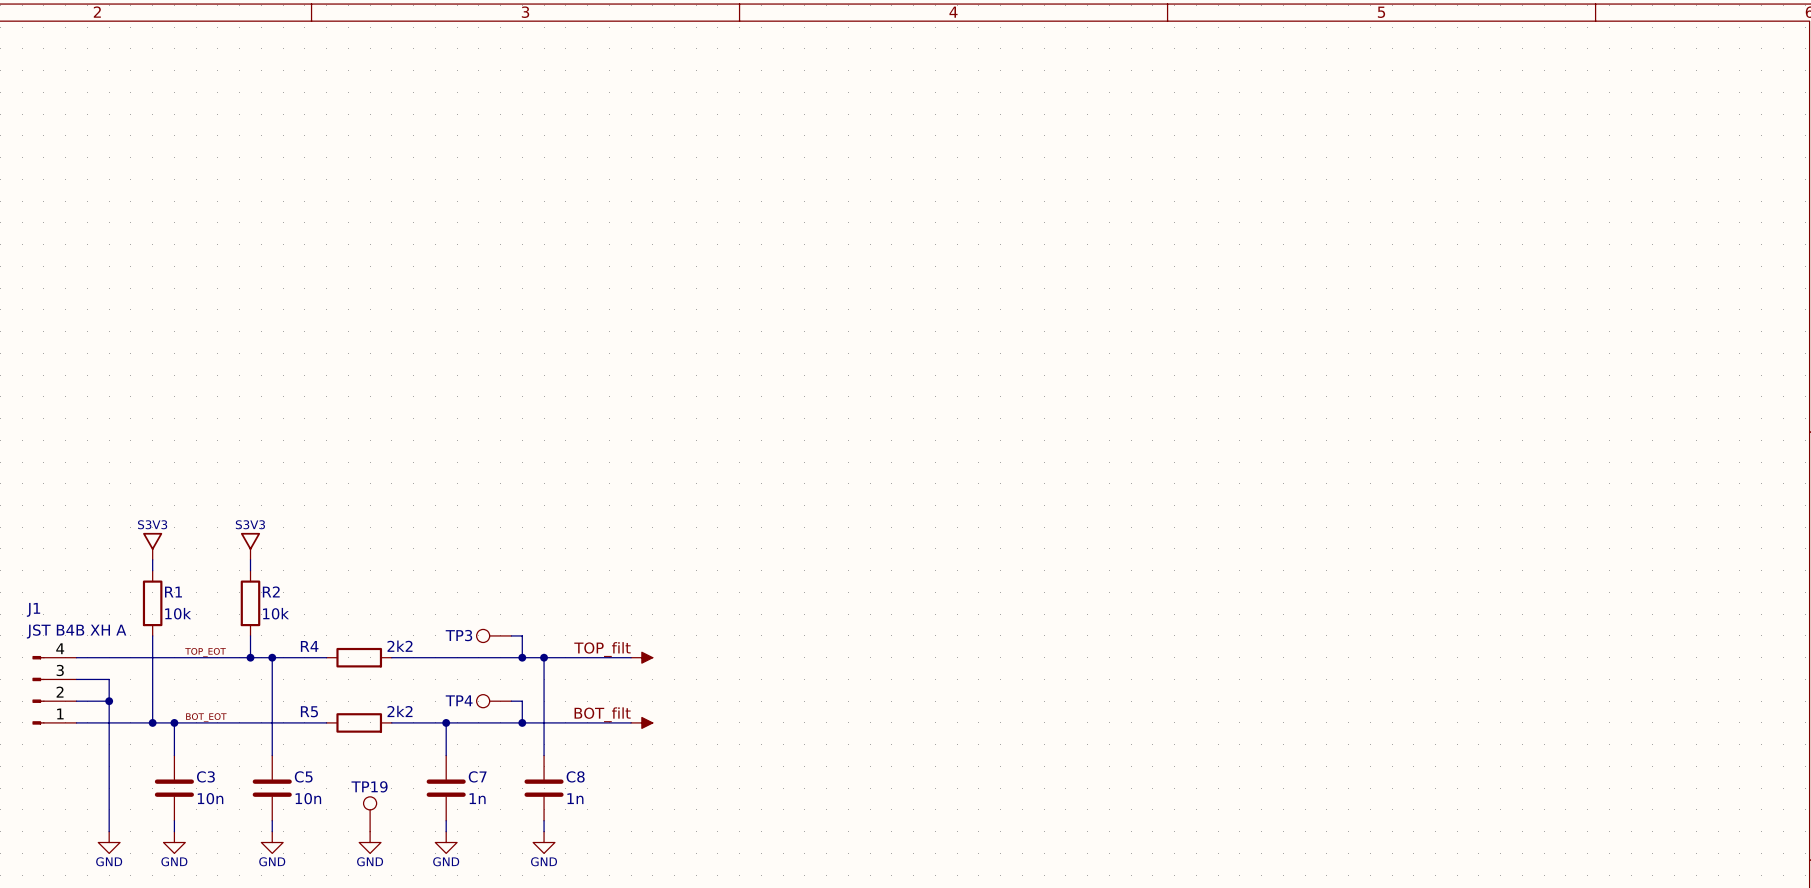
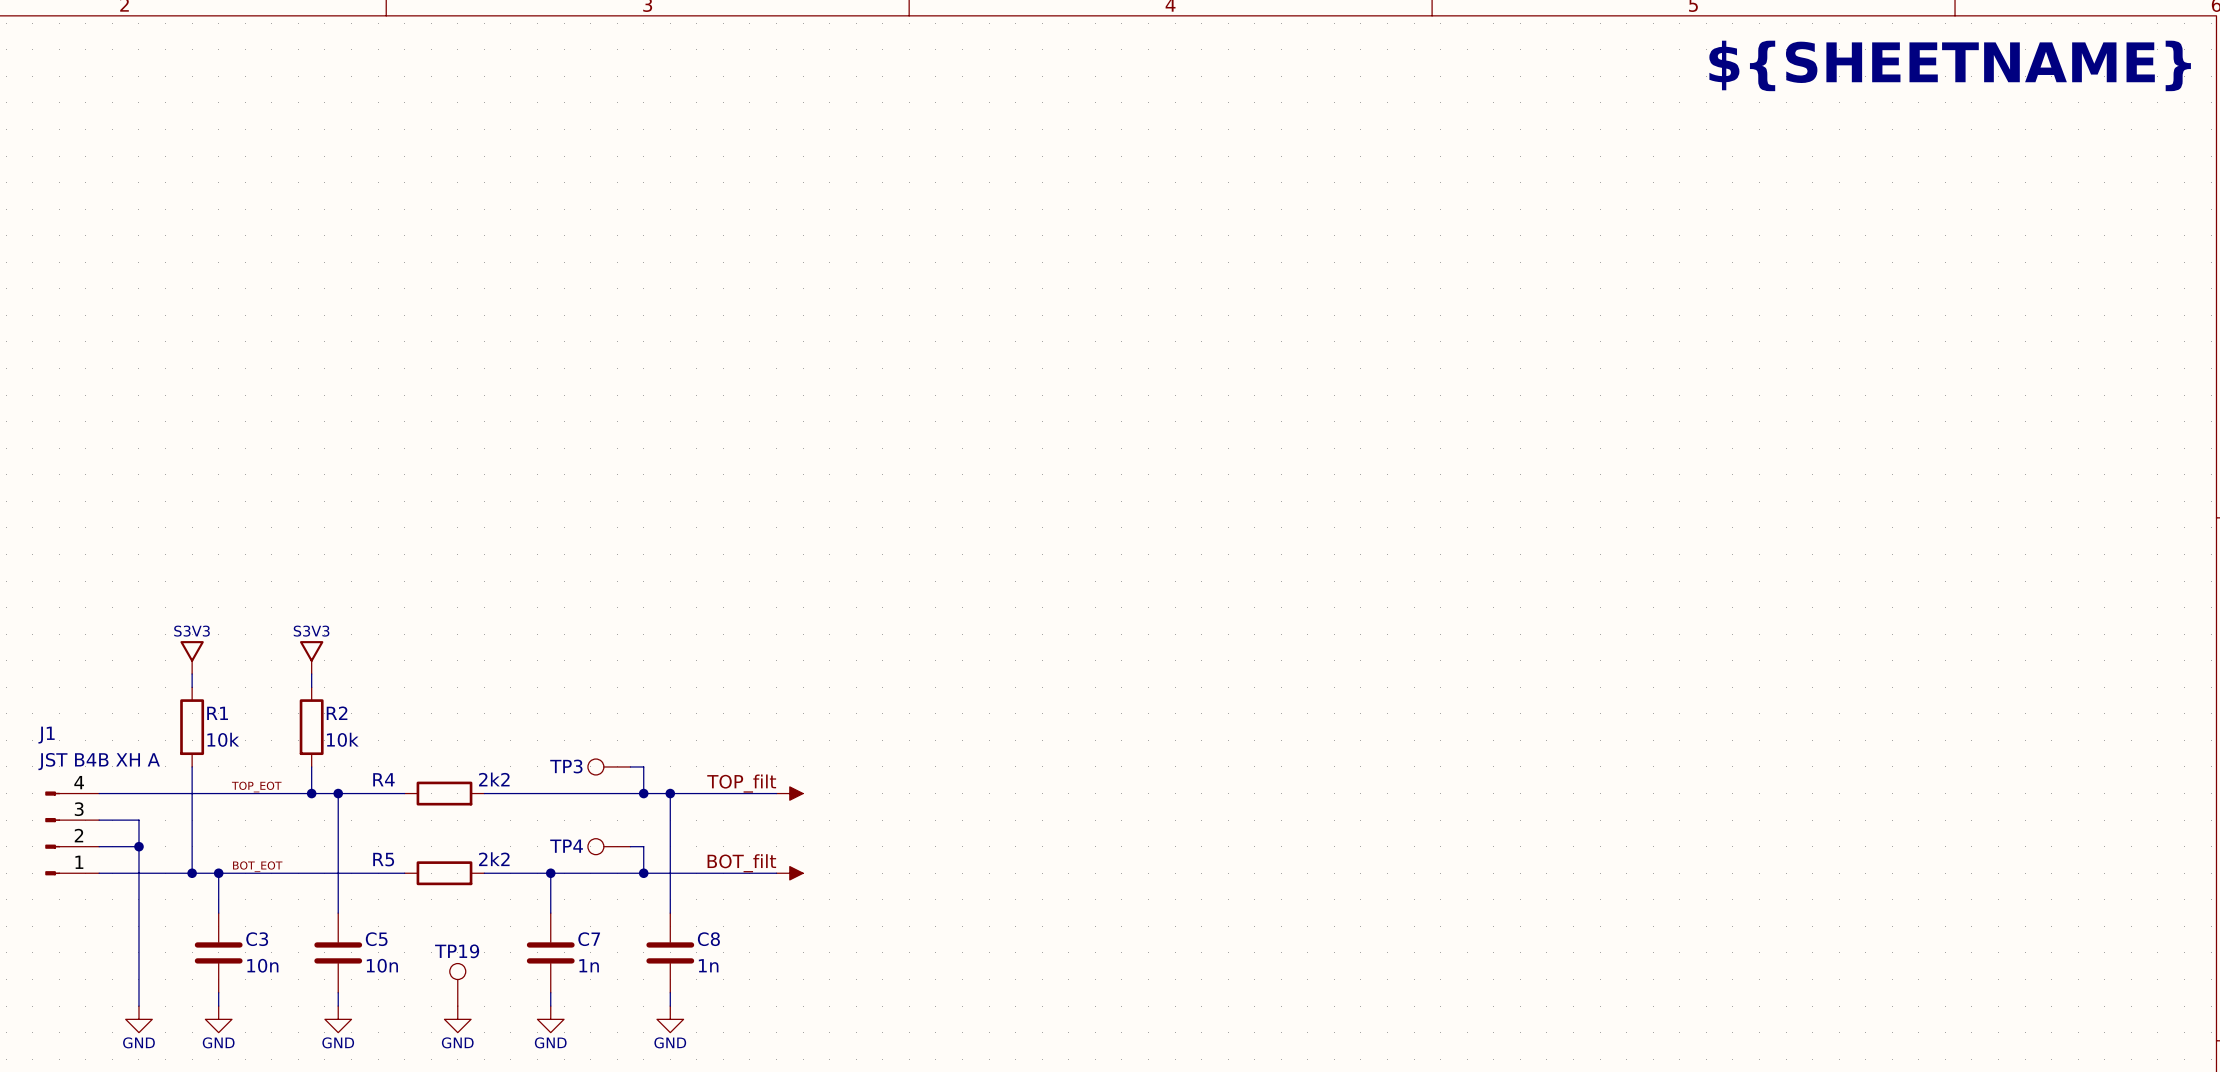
text: none -> ${SHEETNAME} (1950, 65)

